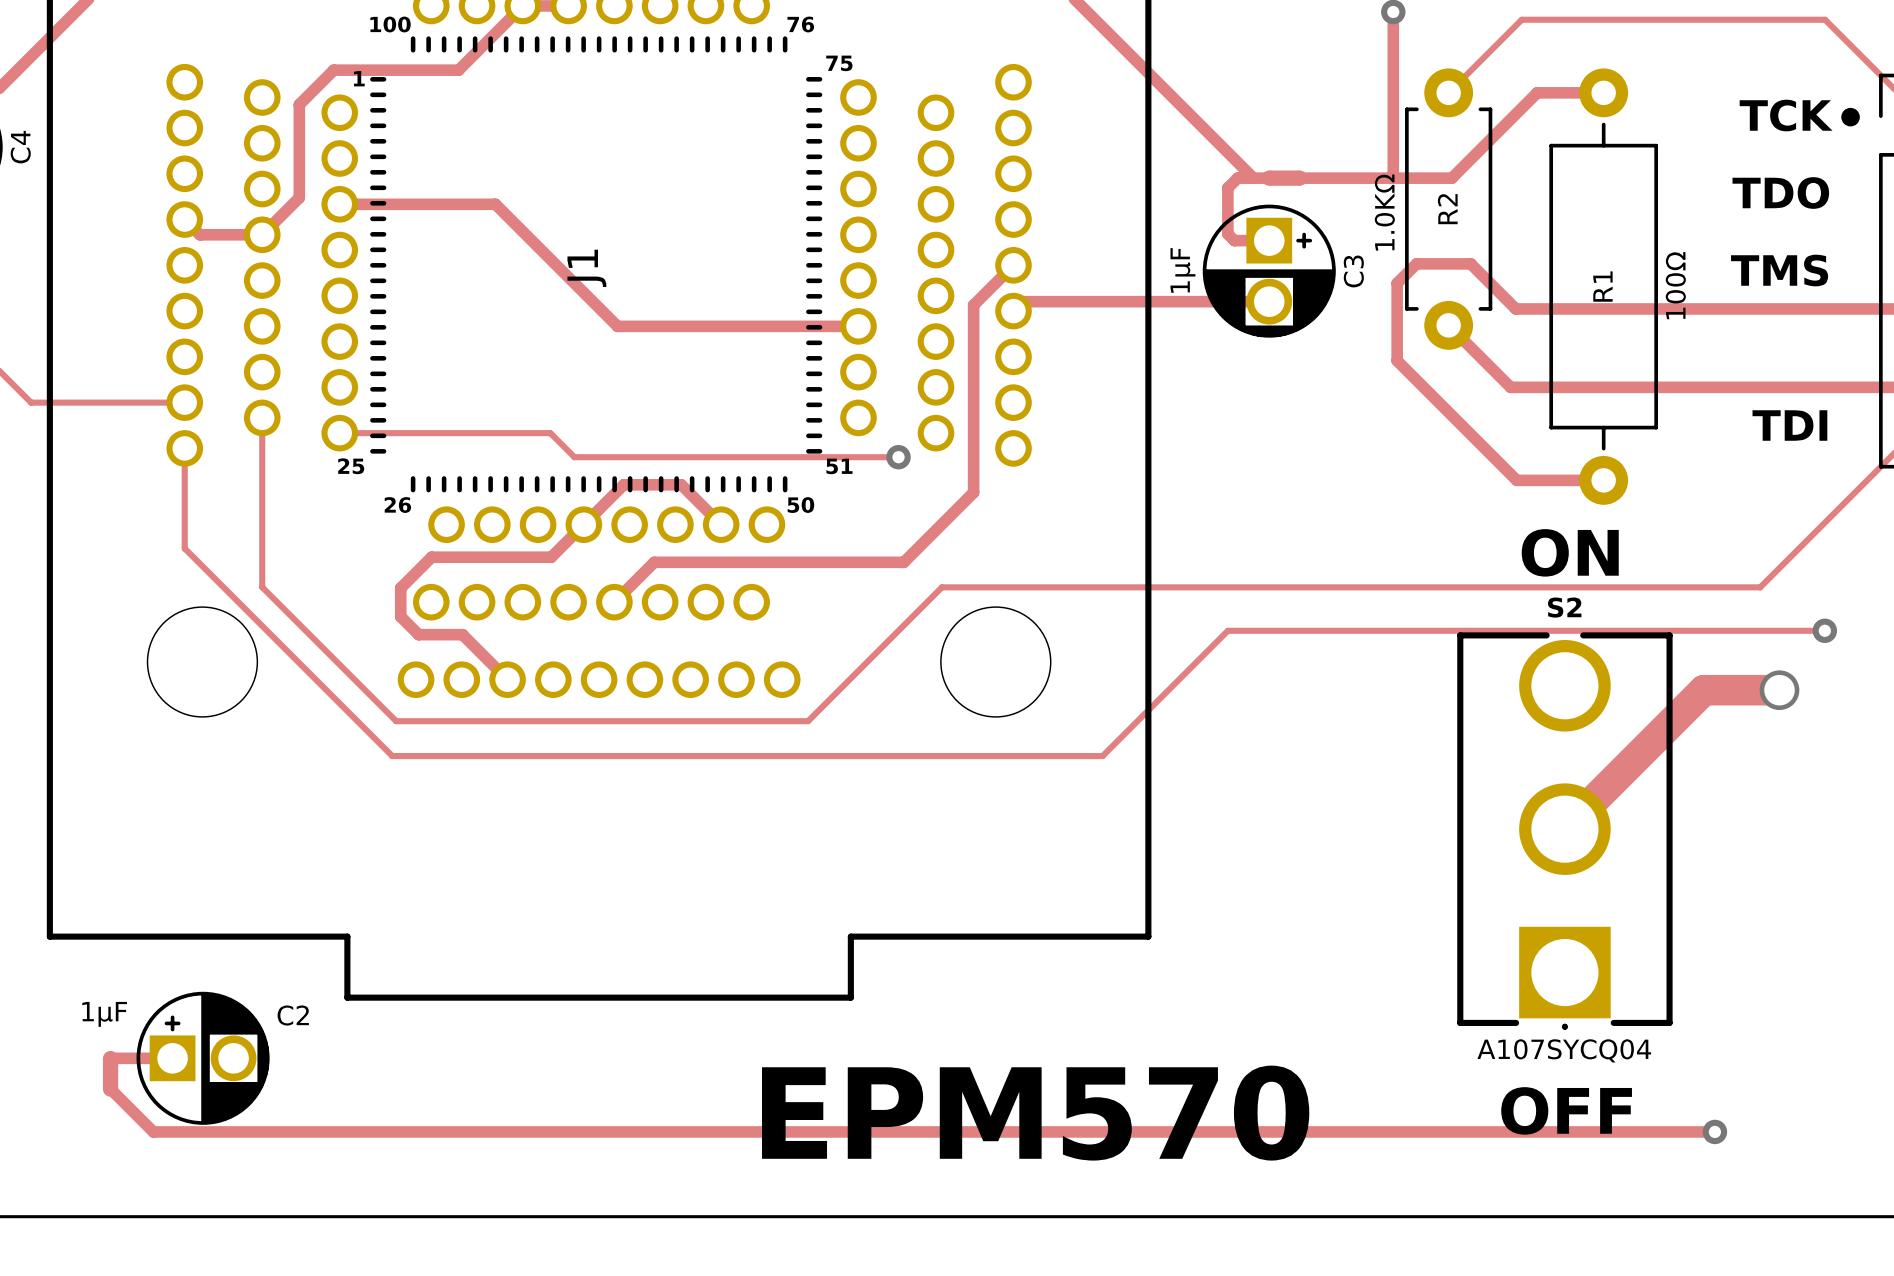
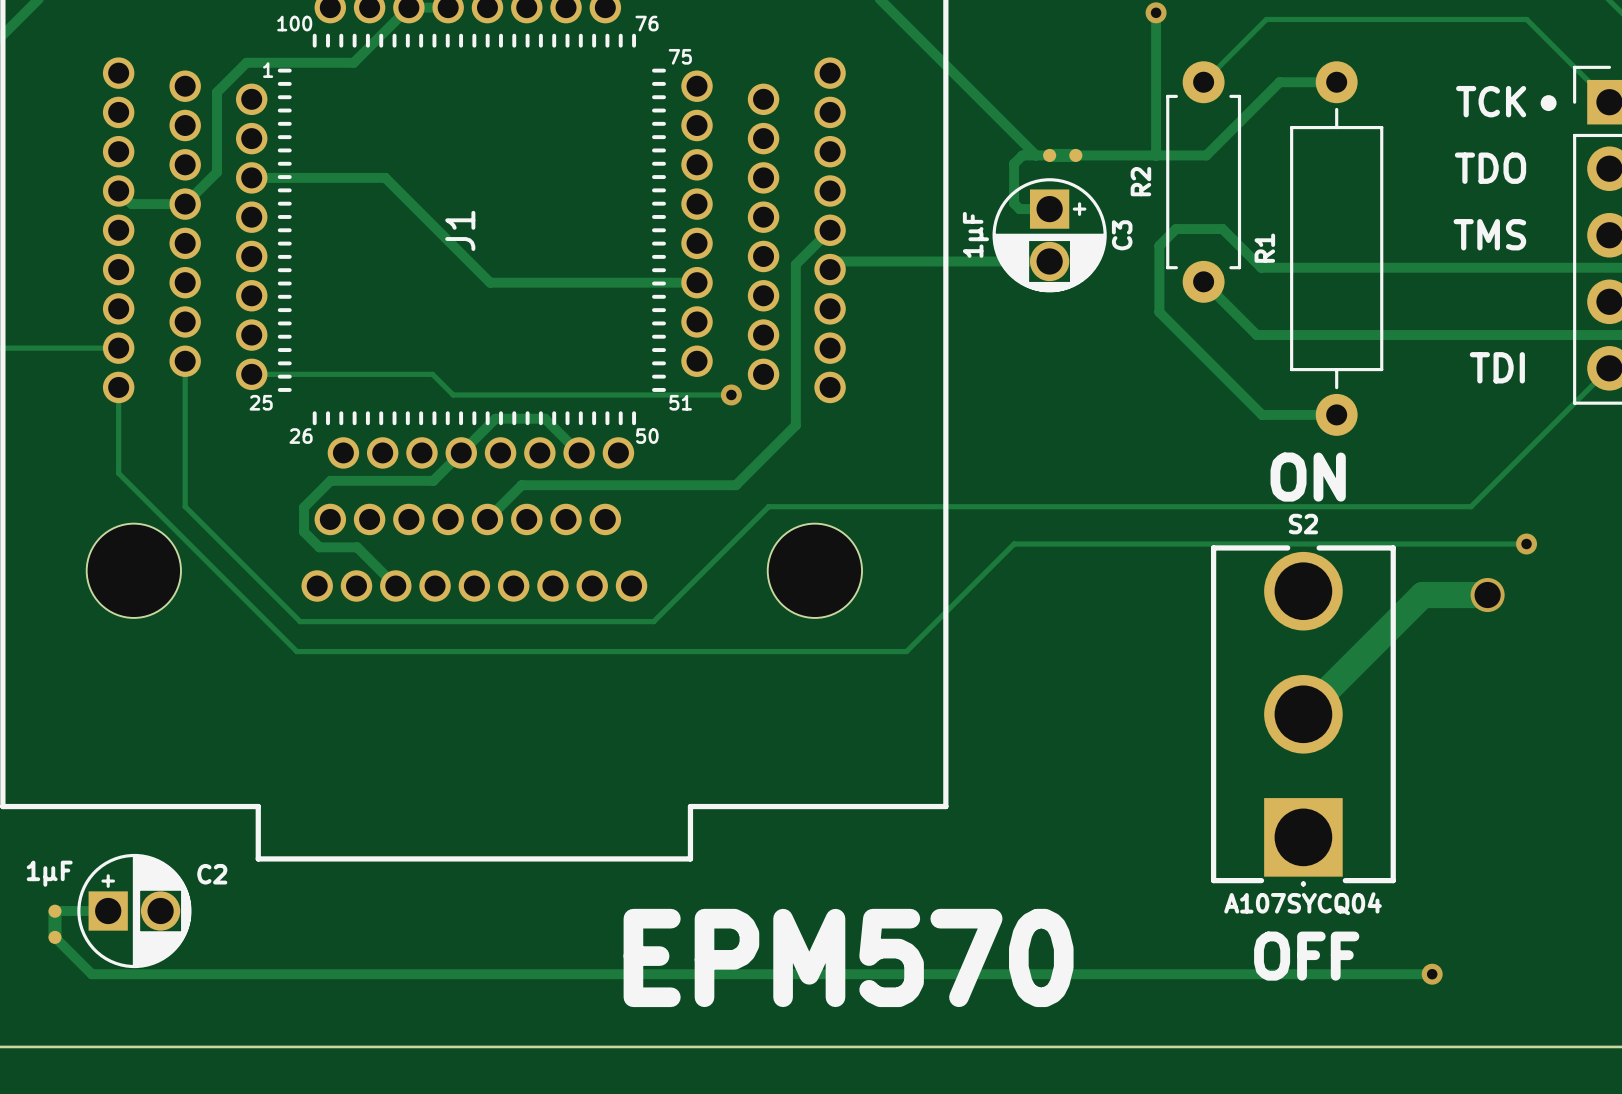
R2 name position: R2 (1447, 209) -> R2 (1140, 181)
R2 value: 1.0KΩ (1384, 212) -> none
R1 value: 100Ω (1675, 285) -> none
R1 name position: R1 (1602, 286) -> R1 (1264, 248)

